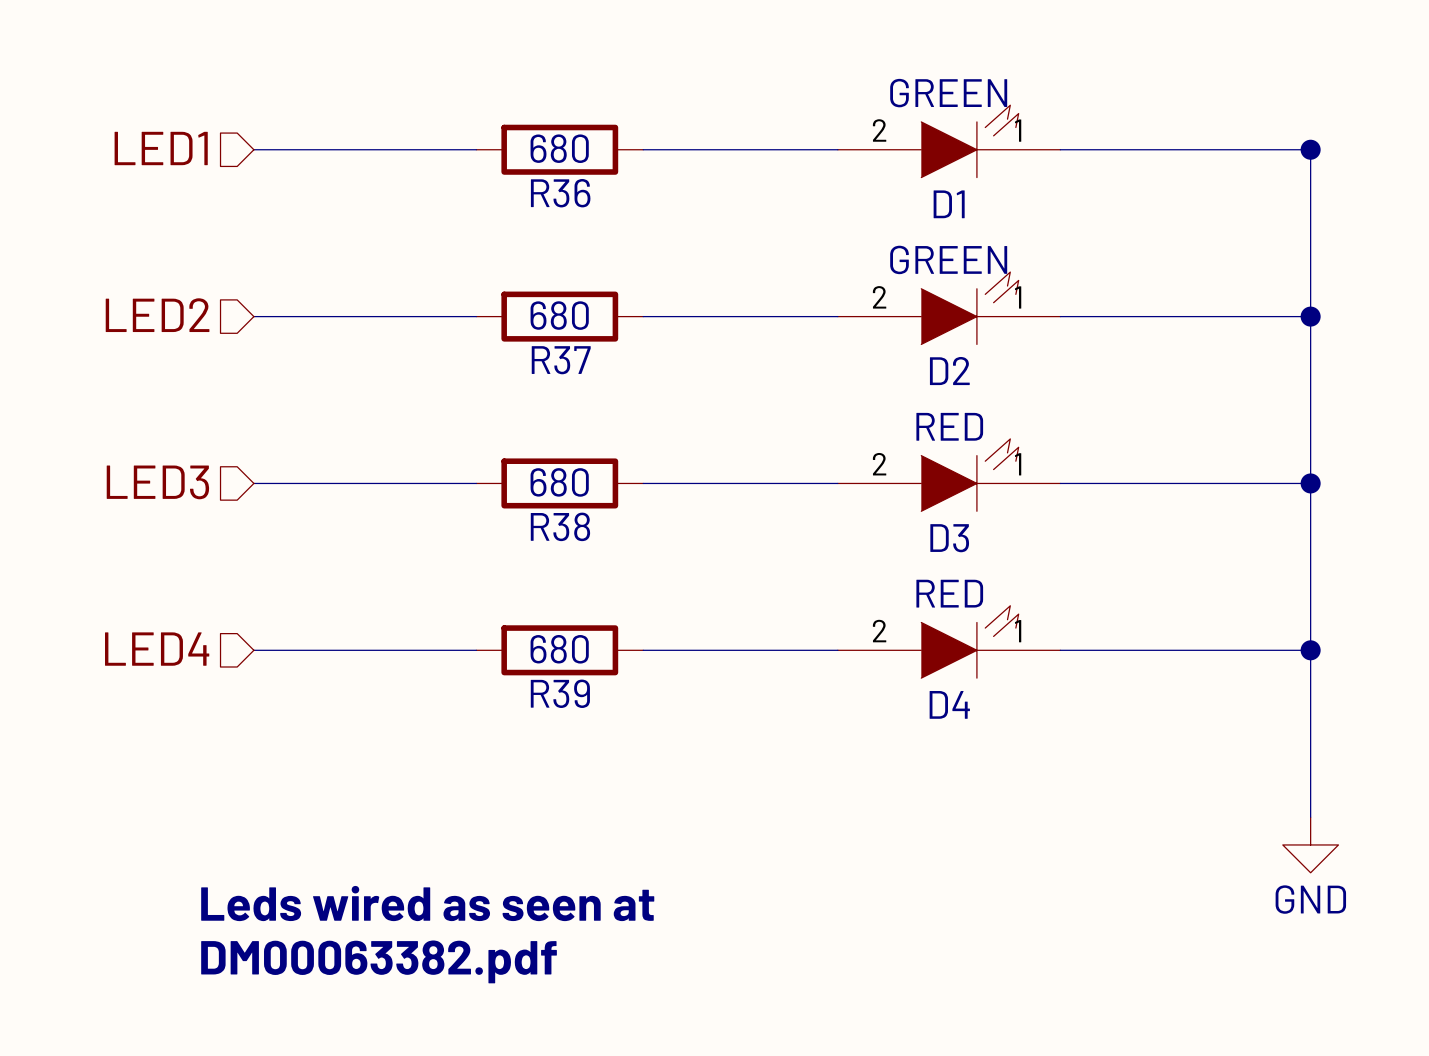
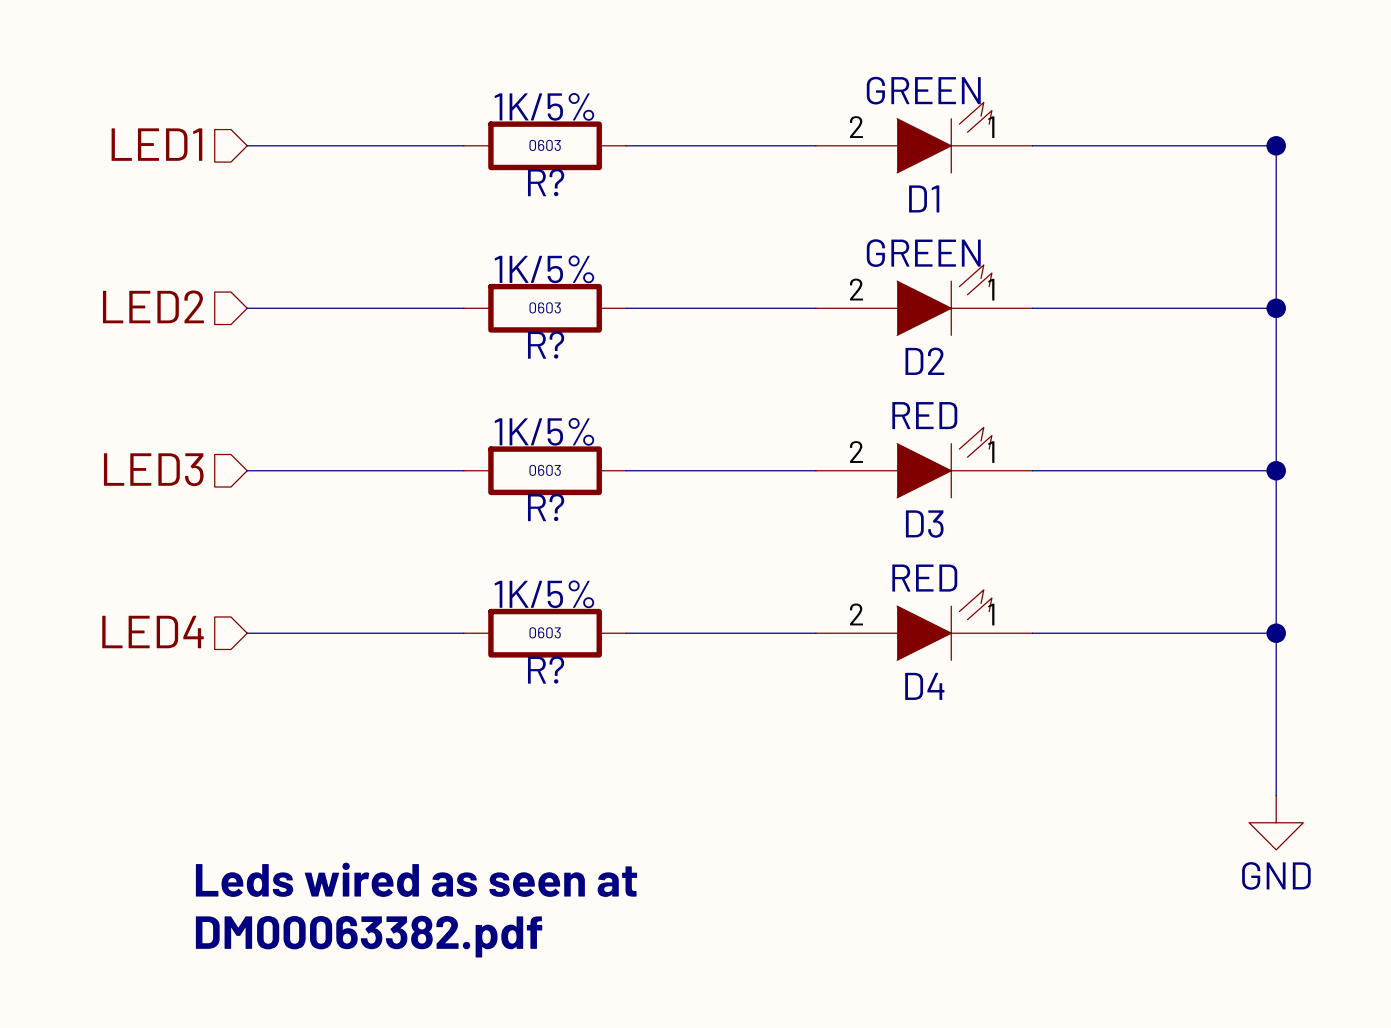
R36 value: 680 (559, 148) -> 1K/5% (544, 106)
R36 text: none -> 0603 (545, 145)
R36 name: R36 (560, 193) -> R? (546, 182)
R37 value: 680 (559, 315) -> 1K/5% (544, 269)
R37 text: none -> 0603 (545, 307)
R37 name: R37 (561, 360) -> R? (546, 345)
R38 value: 680 (559, 482) -> 1K/5% (544, 431)
R38 text: none -> 0603 (545, 470)
R38 name: R38 (560, 526) -> R? (546, 507)
R39 text: none -> 0603 (545, 632)
R39 value: 680 (559, 649) -> 1K/5% (544, 594)
R39 name: R39 (560, 693) -> R? (546, 669)

